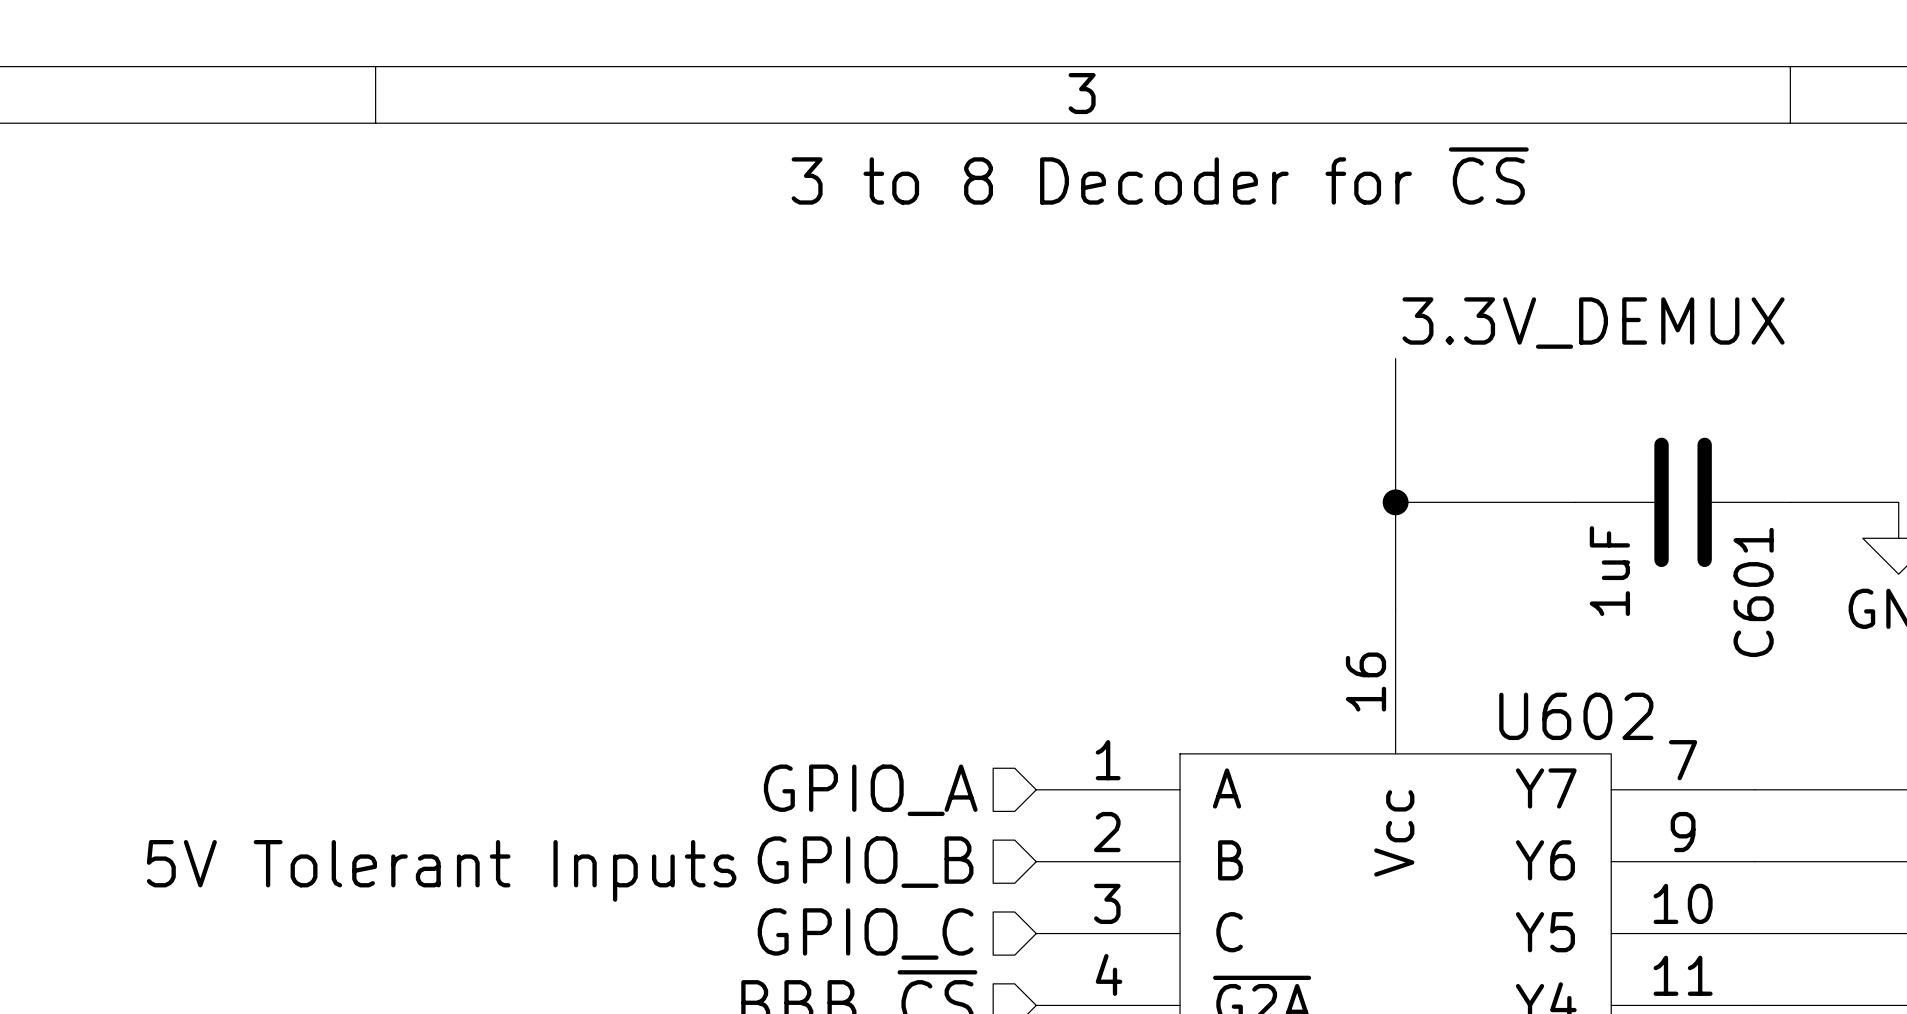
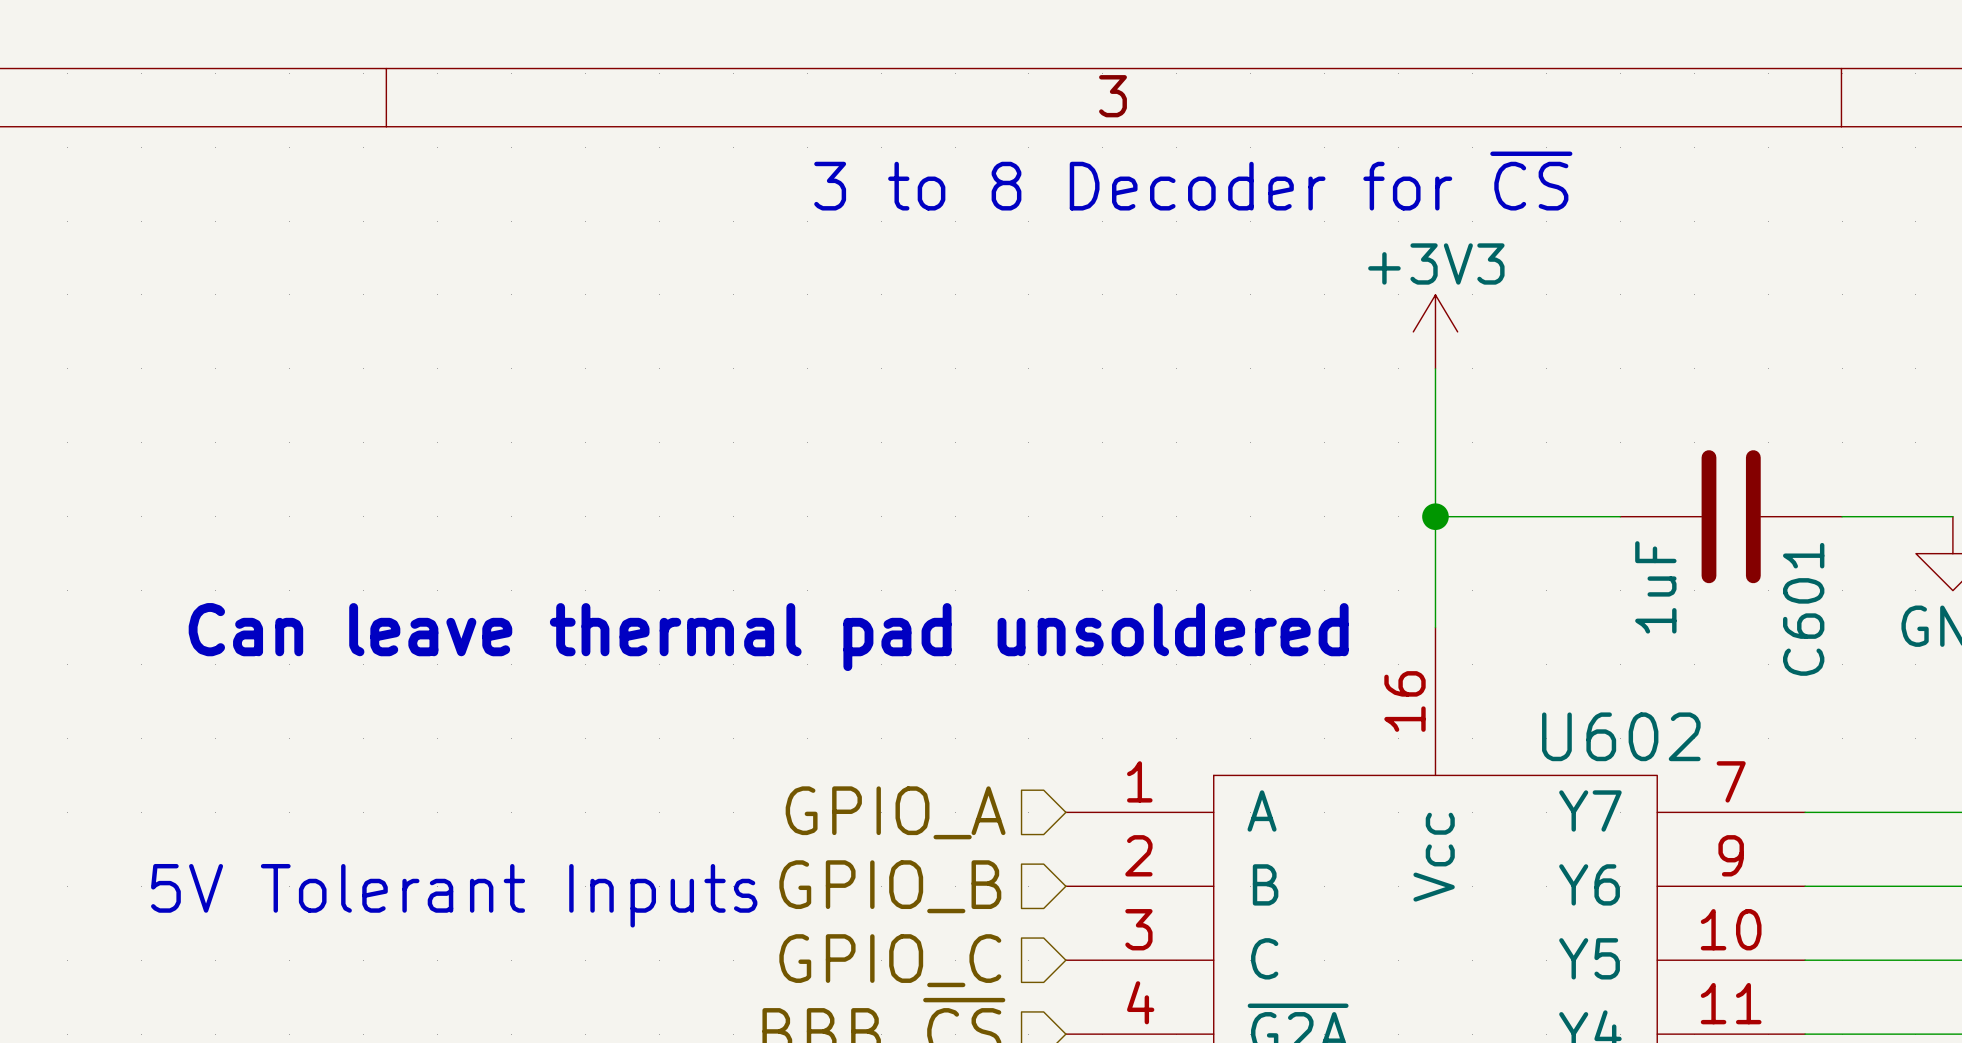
power symbol: none -> +3V3 (1435, 331)
label: 3.3V_DEMUX (1593, 323) -> none
text: none -> Can leave thermal pad unsoldered (768, 637)

